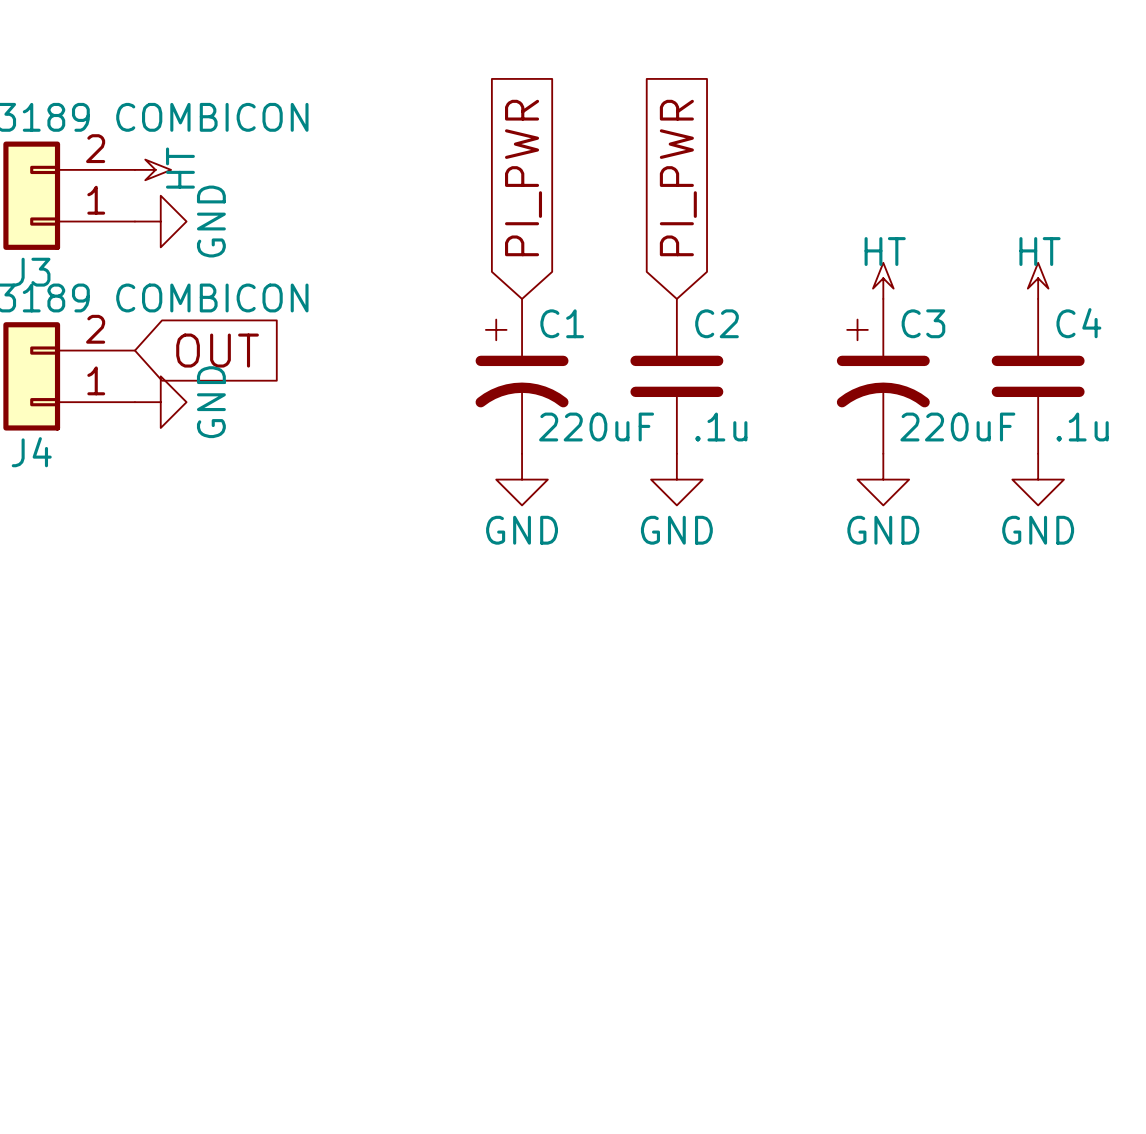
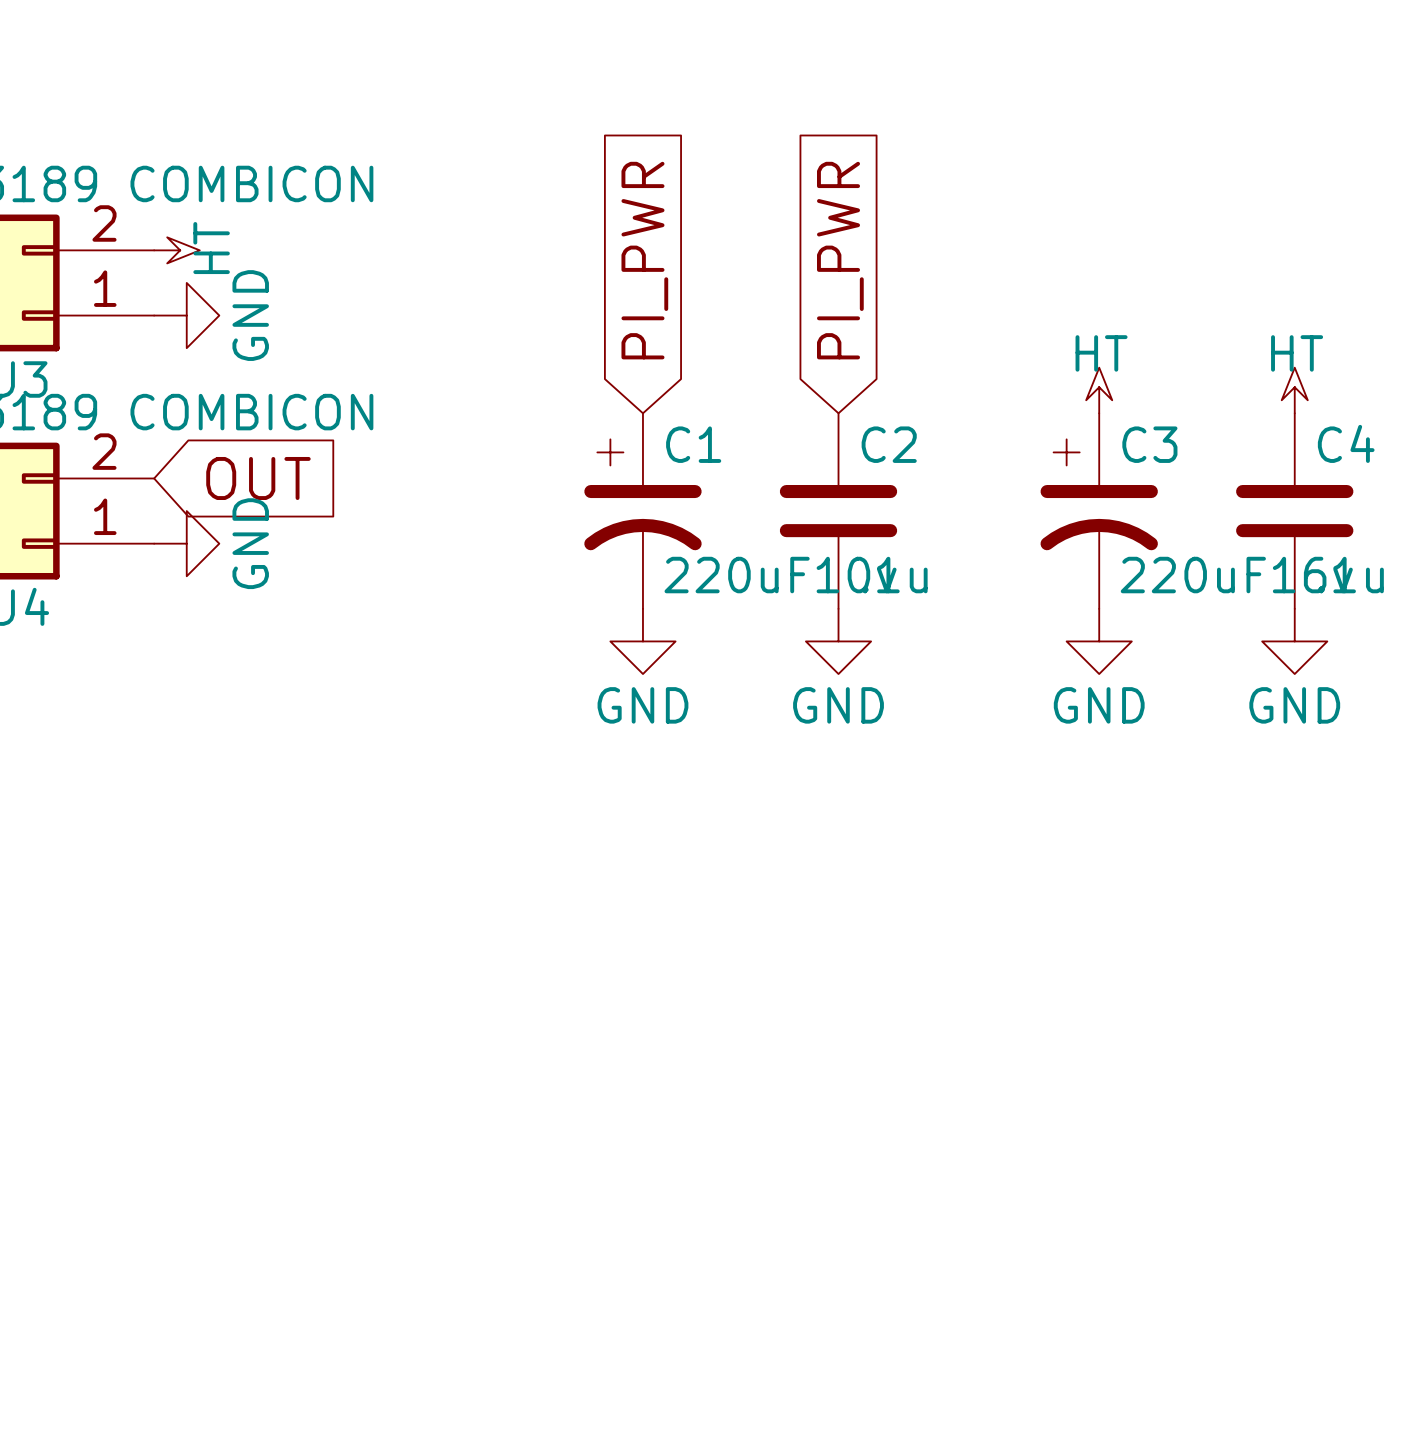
C1 value: 220uF (596, 427) -> 220uF10v (780, 575)
C3 value: 220uF (957, 427) -> 220uF16v (1236, 575)

